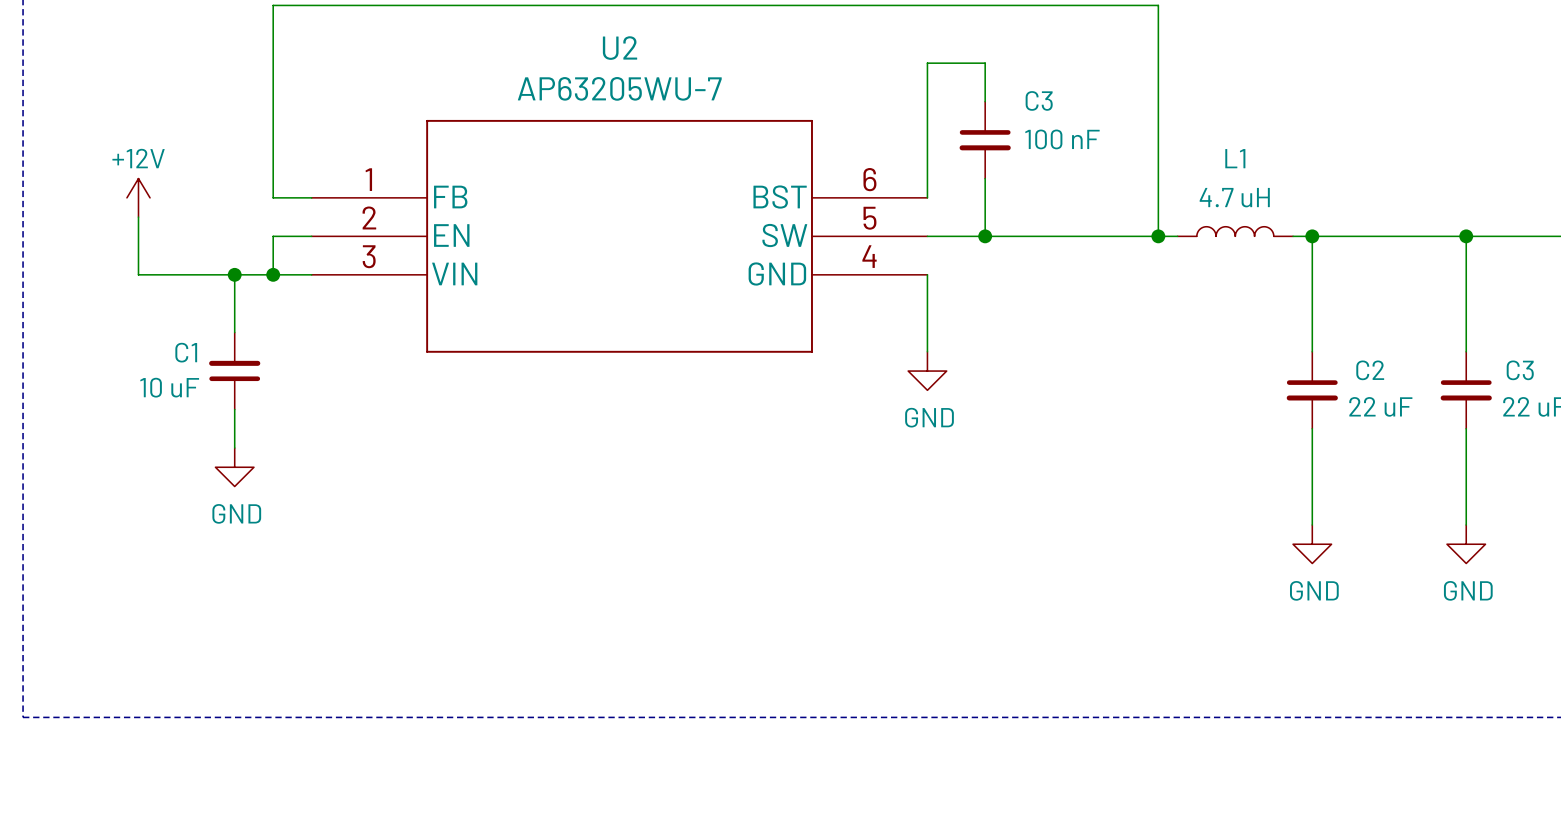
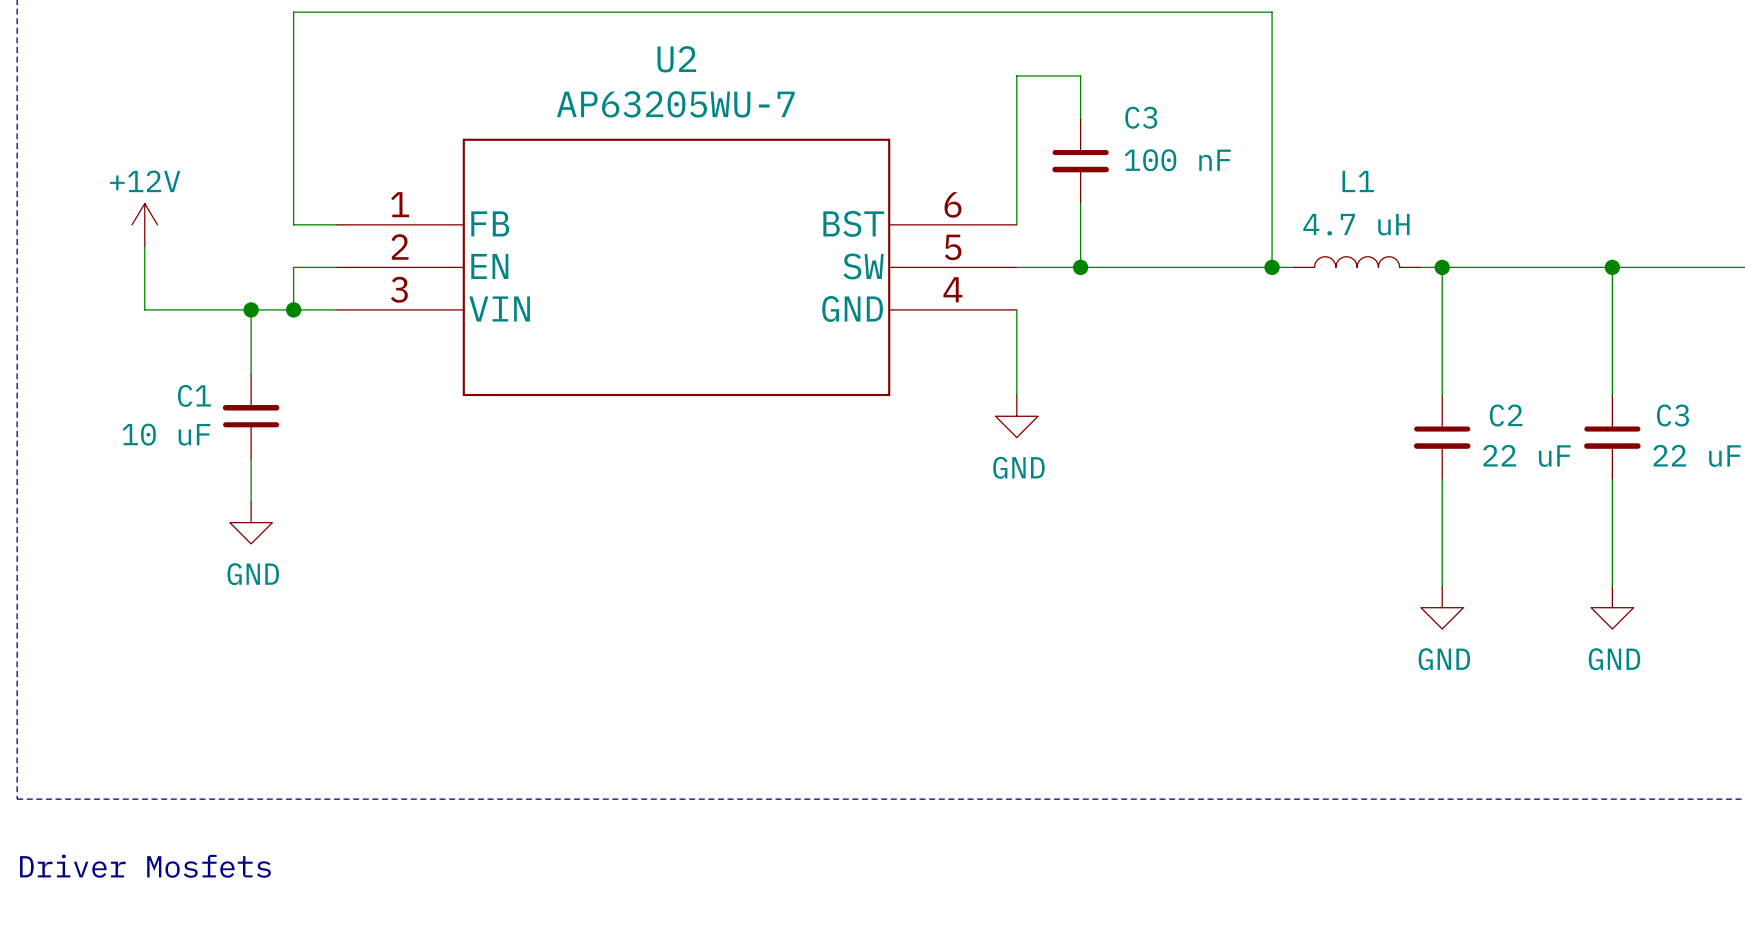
text: none -> Driver Mosfets (145, 866)

